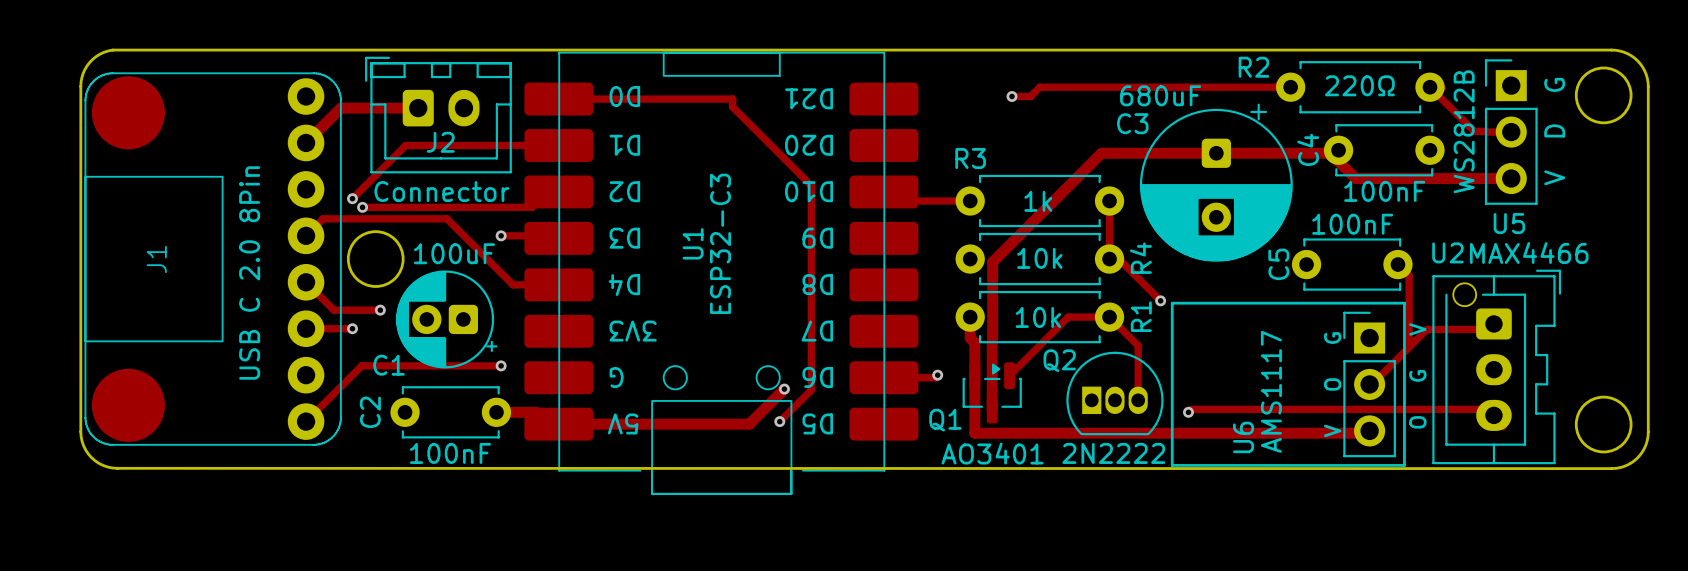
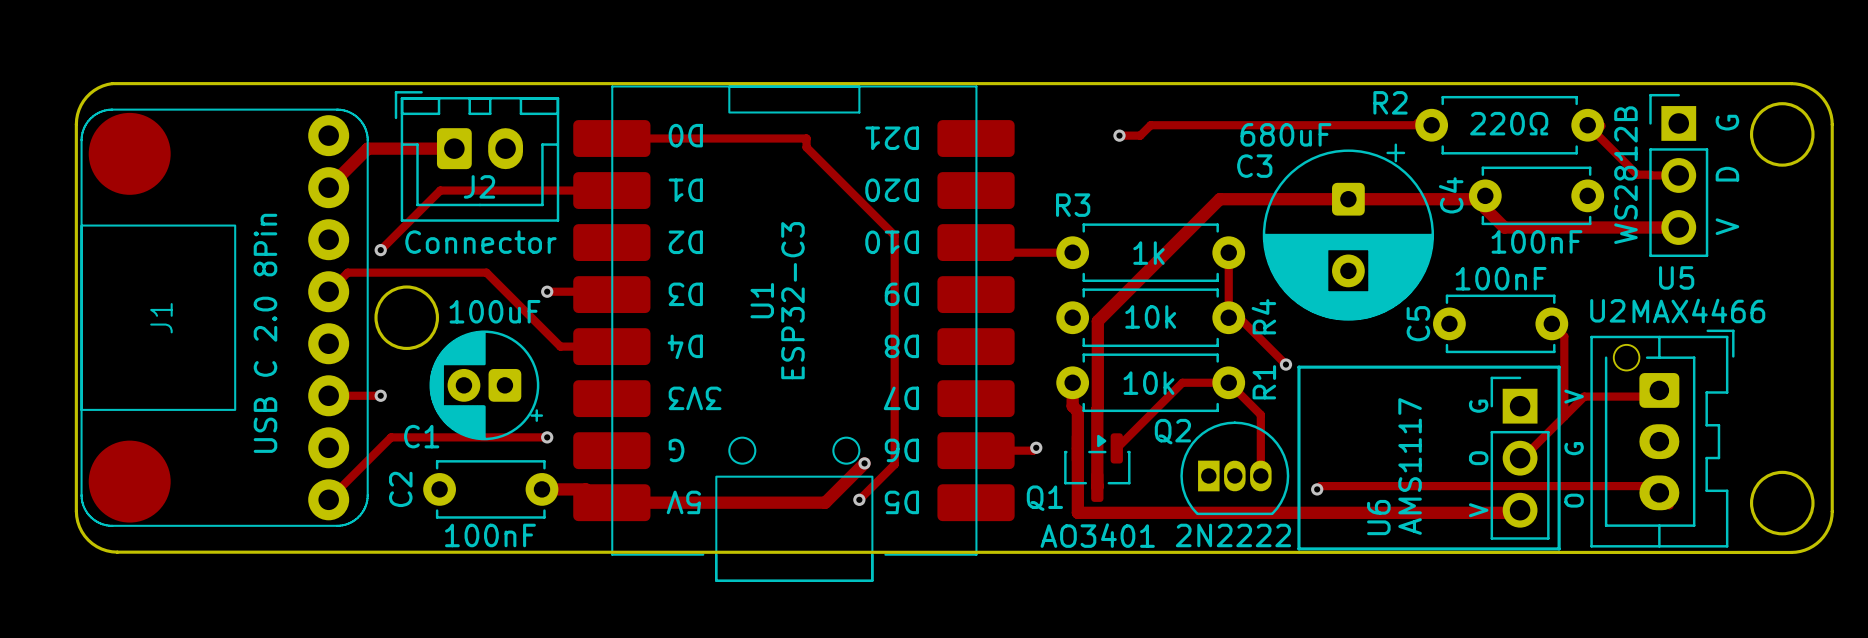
track: (547, 191) (532, 207) (362, 207) -> none
via: (362, 207) -> none
track: (306, 282) (333, 310) (380, 310) -> none
via: (380, 310) -> none

